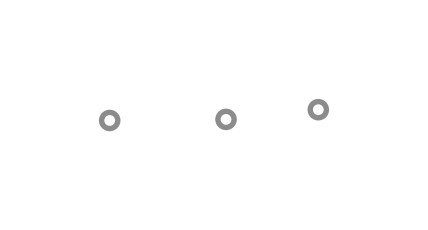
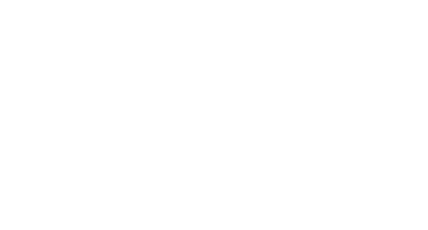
via: (318, 109) -> none
via: (226, 119) -> none
via: (109, 120) -> none

